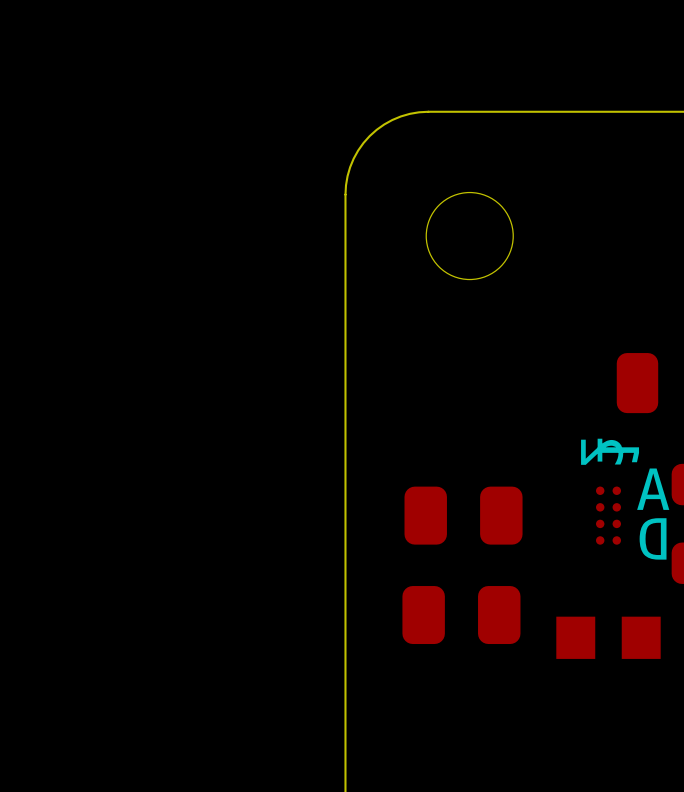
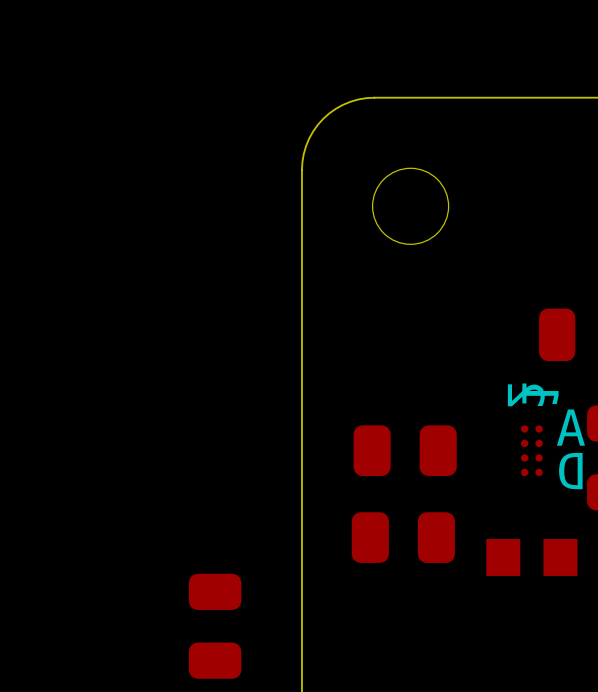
part: none -> (215, 626)

